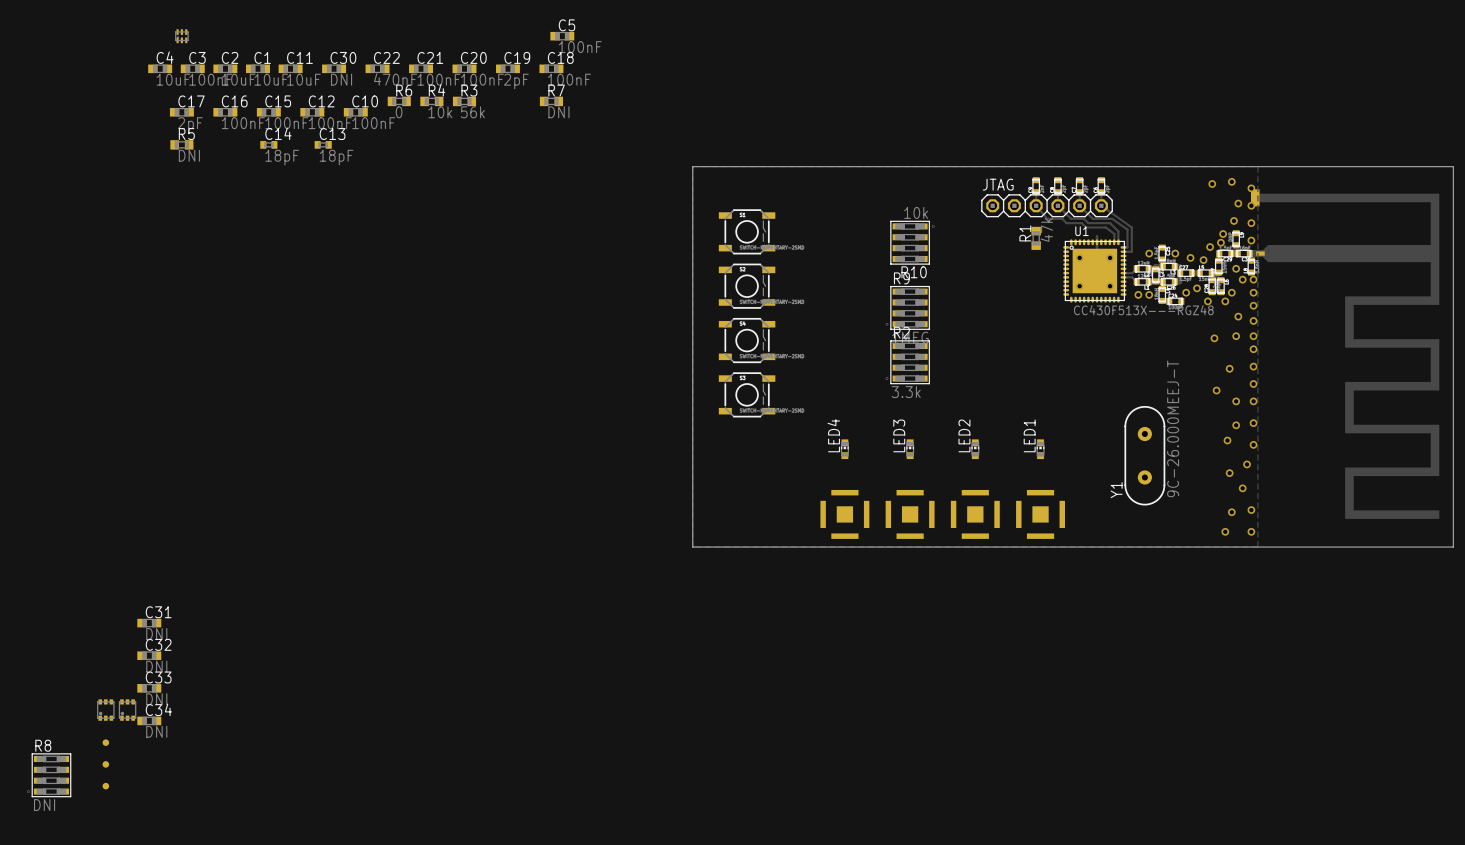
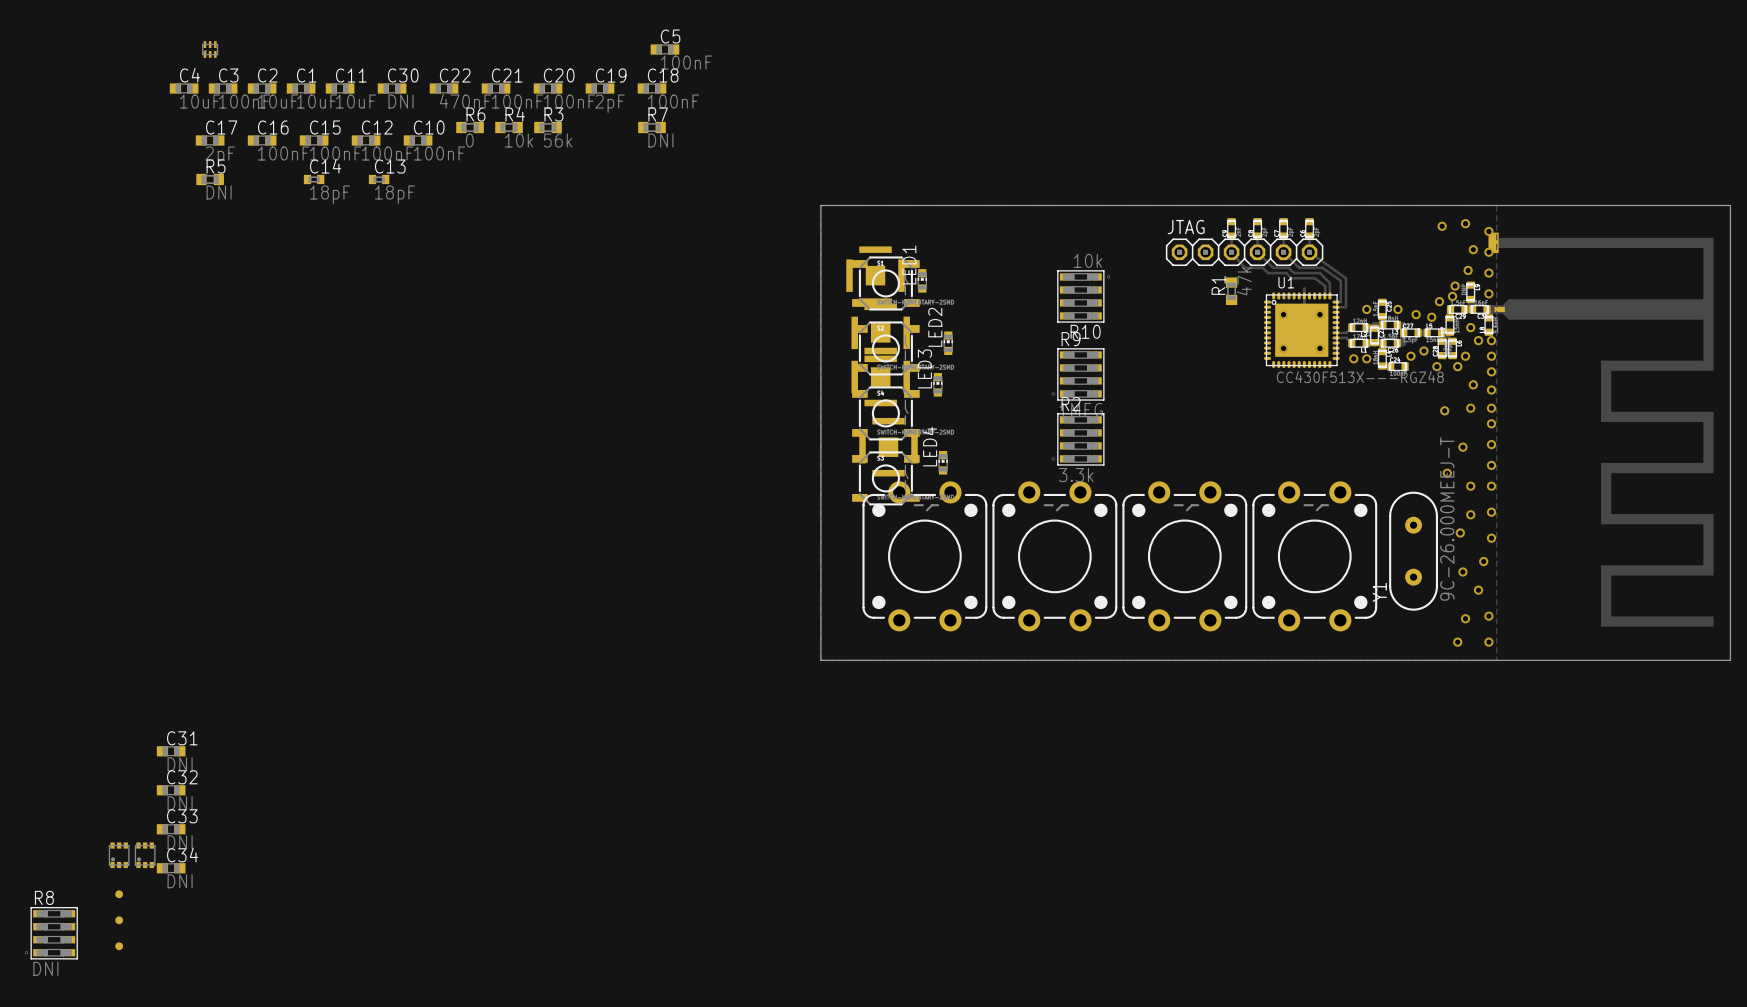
part: none -> (875, 275)
part: none -> (880, 332)
part: none -> (880, 377)
part: none -> (888, 447)
LED4 position: (844, 449) -> (943, 462)
LED3 position: (910, 449) -> (937, 384)
LED2 position: (975, 449) -> (948, 343)
LED1 position: (1040, 449) -> (922, 280)
Y1 position: (1144, 455) -> (1413, 551)
part: none -> (924, 556)
part: none -> (1054, 556)
part: none -> (1184, 556)
part: none -> (1314, 556)
part: (844, 514) -> none
part: (910, 514) -> none
part: (975, 514) -> none
part: (1040, 514) -> none

